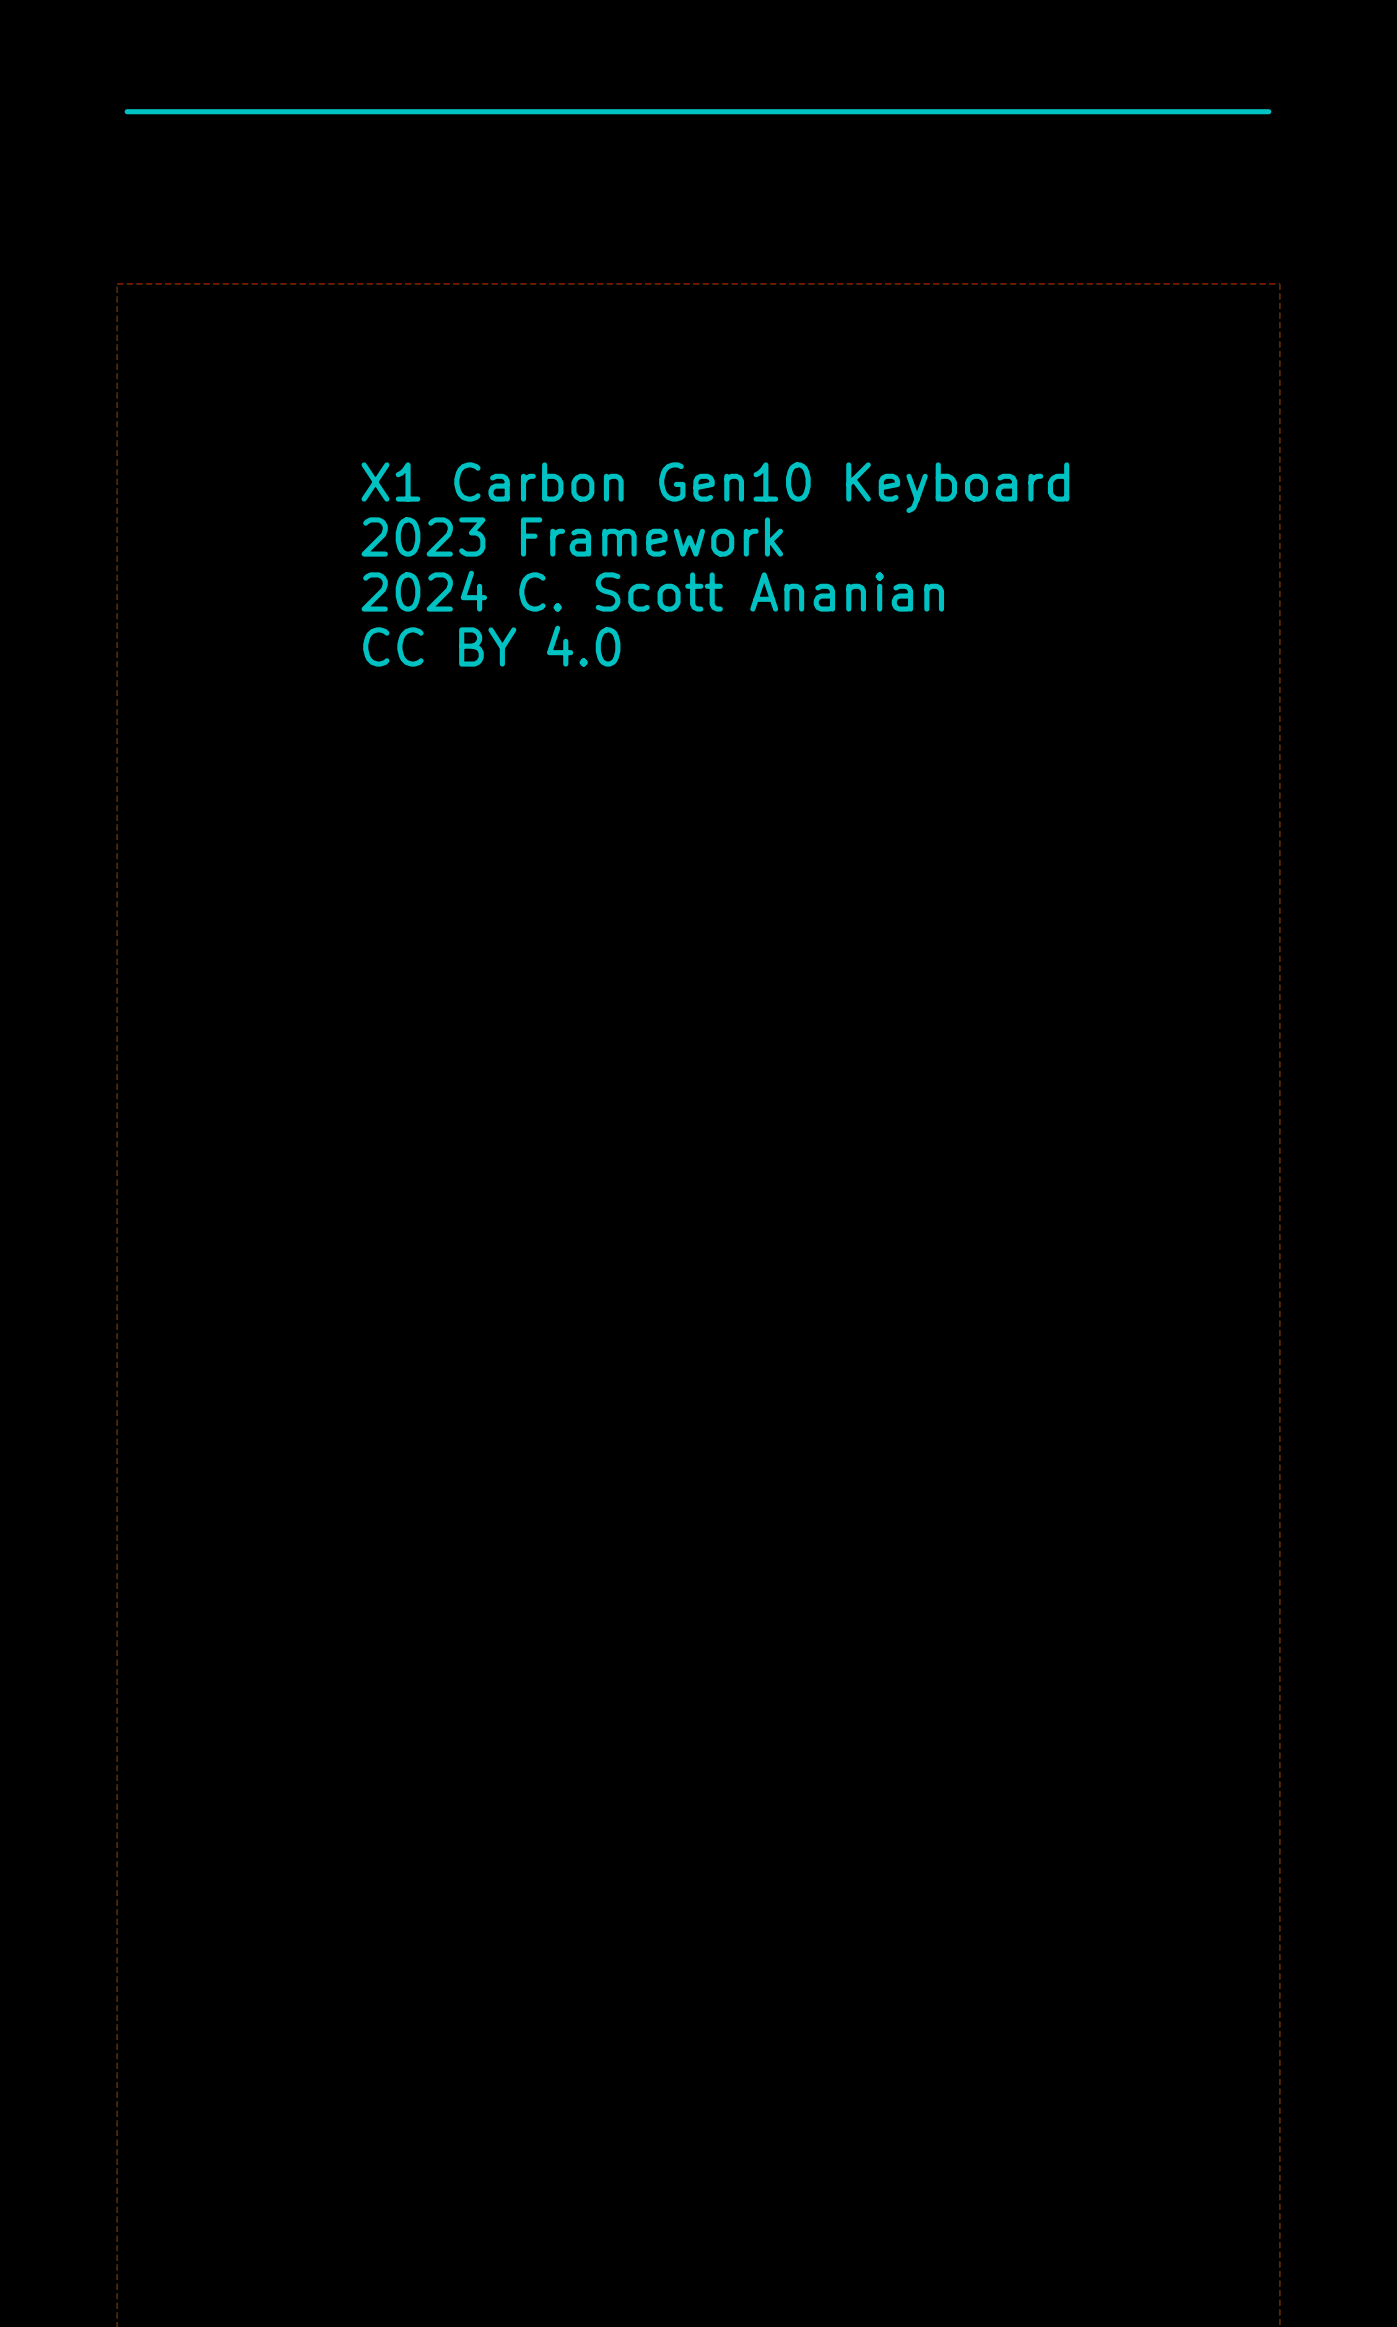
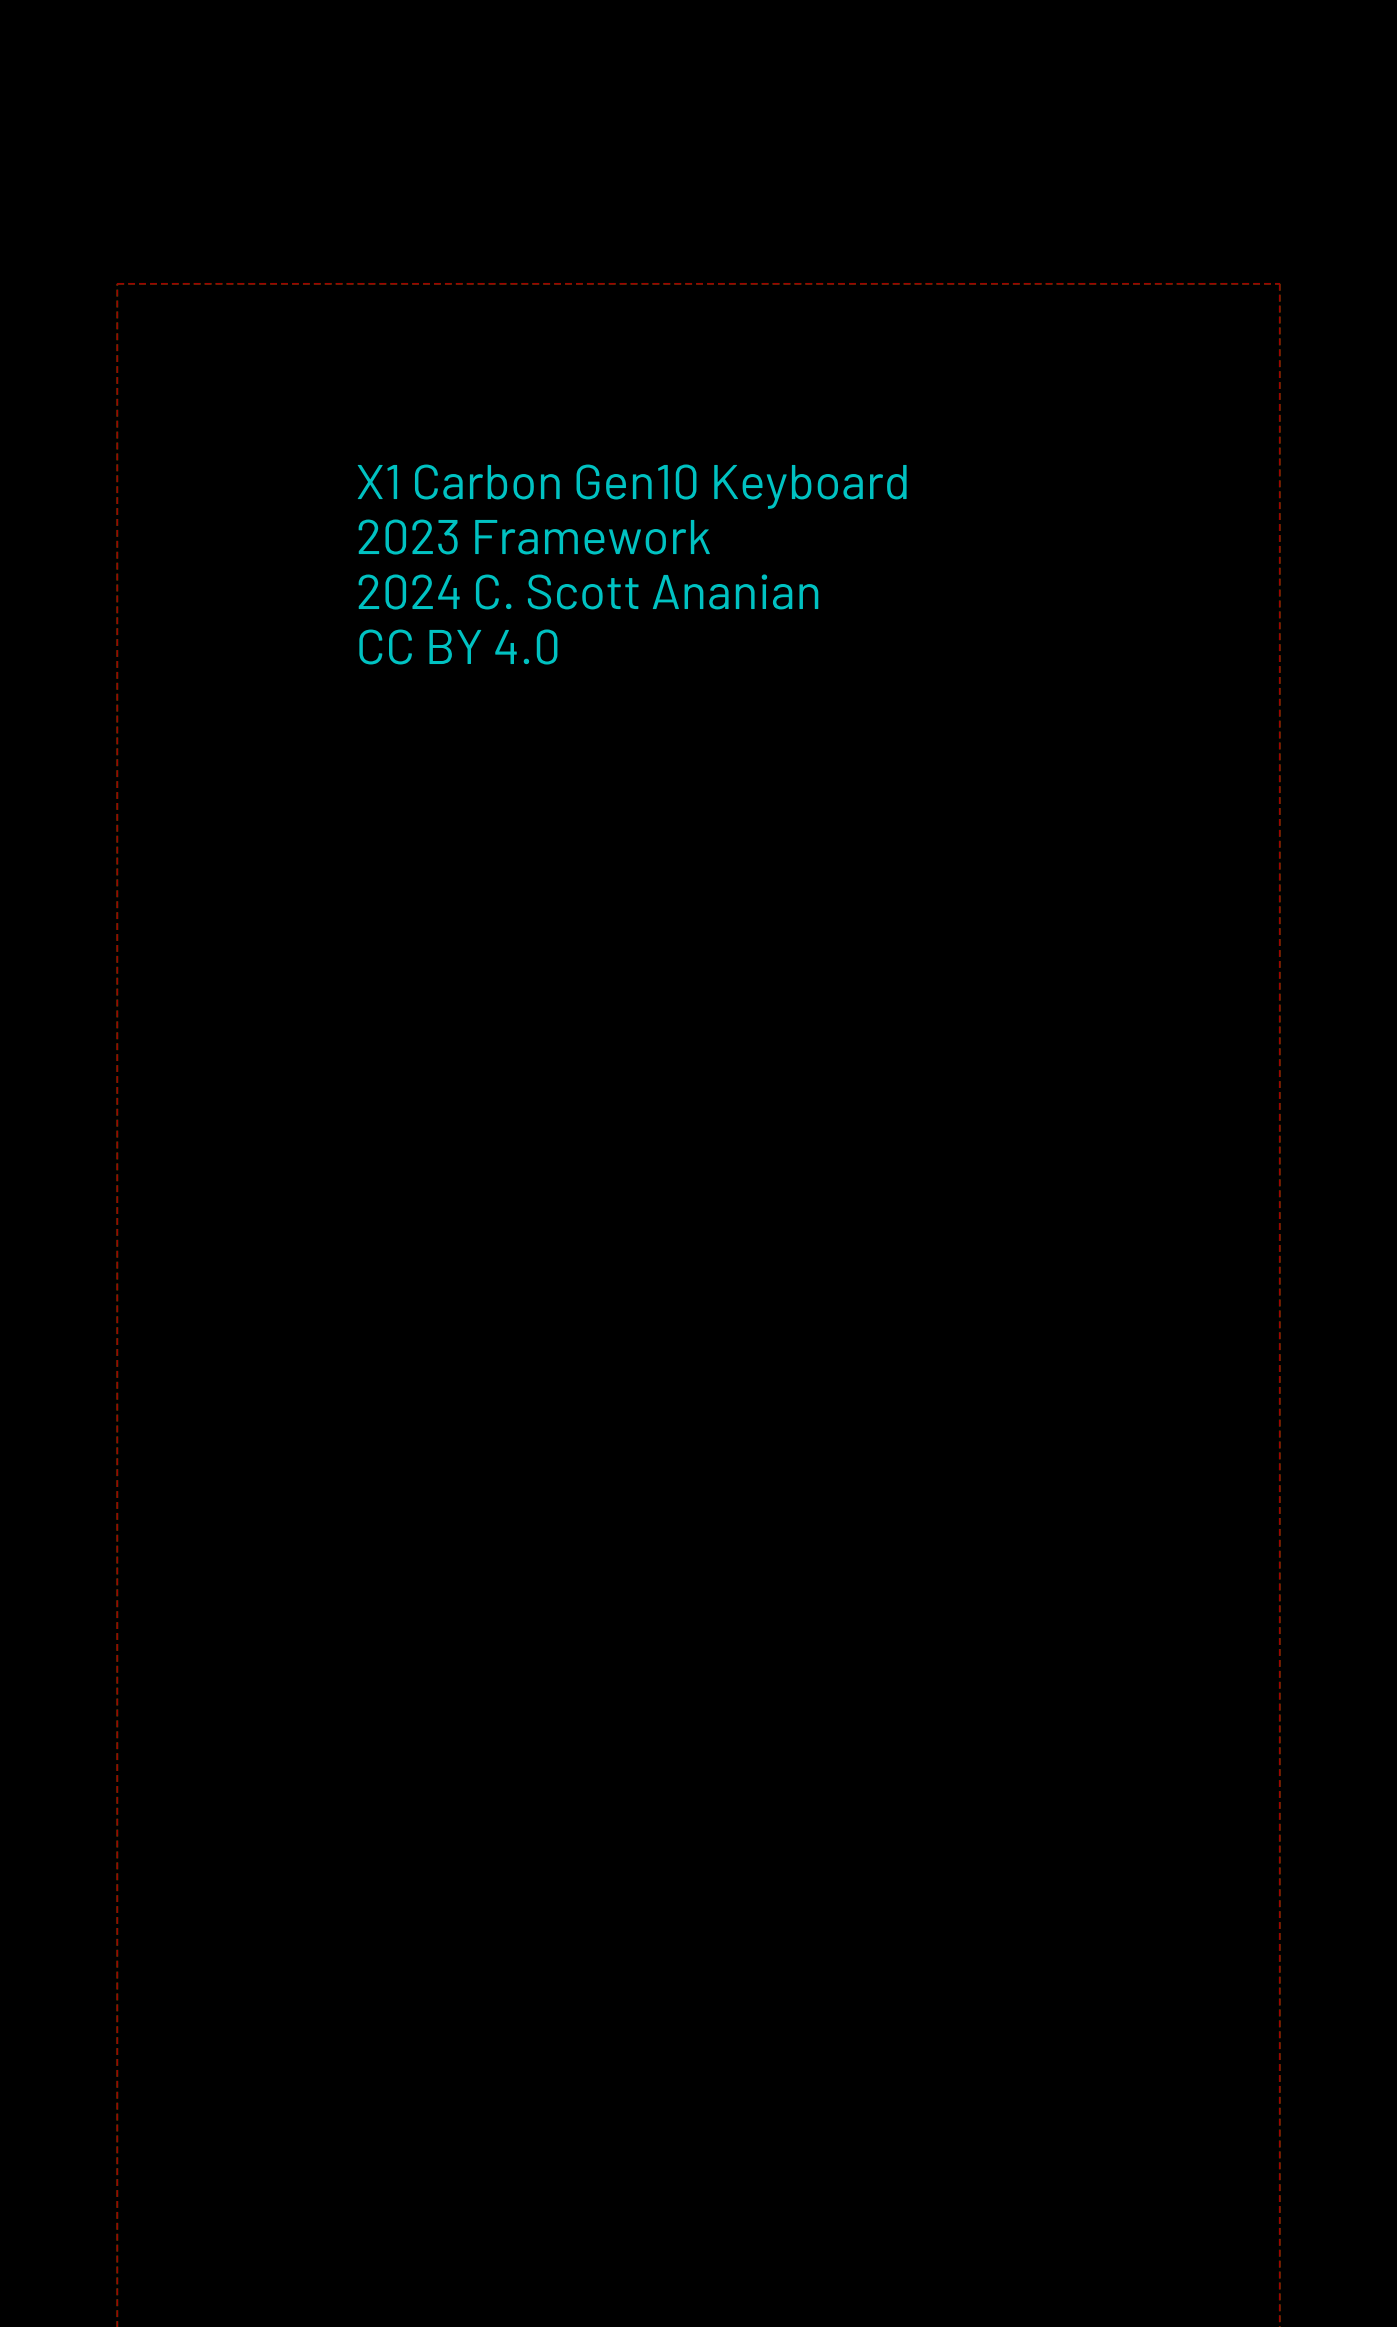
line: (127, 111) (1268, 111) -> none

